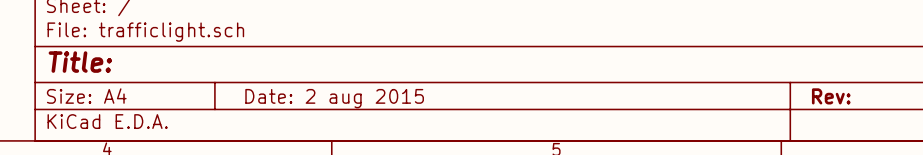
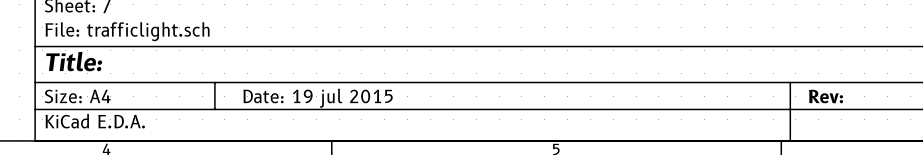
title block: Date: 2 aug 2015 (334, 98) -> Date: 19 jul 2015 (318, 98)

